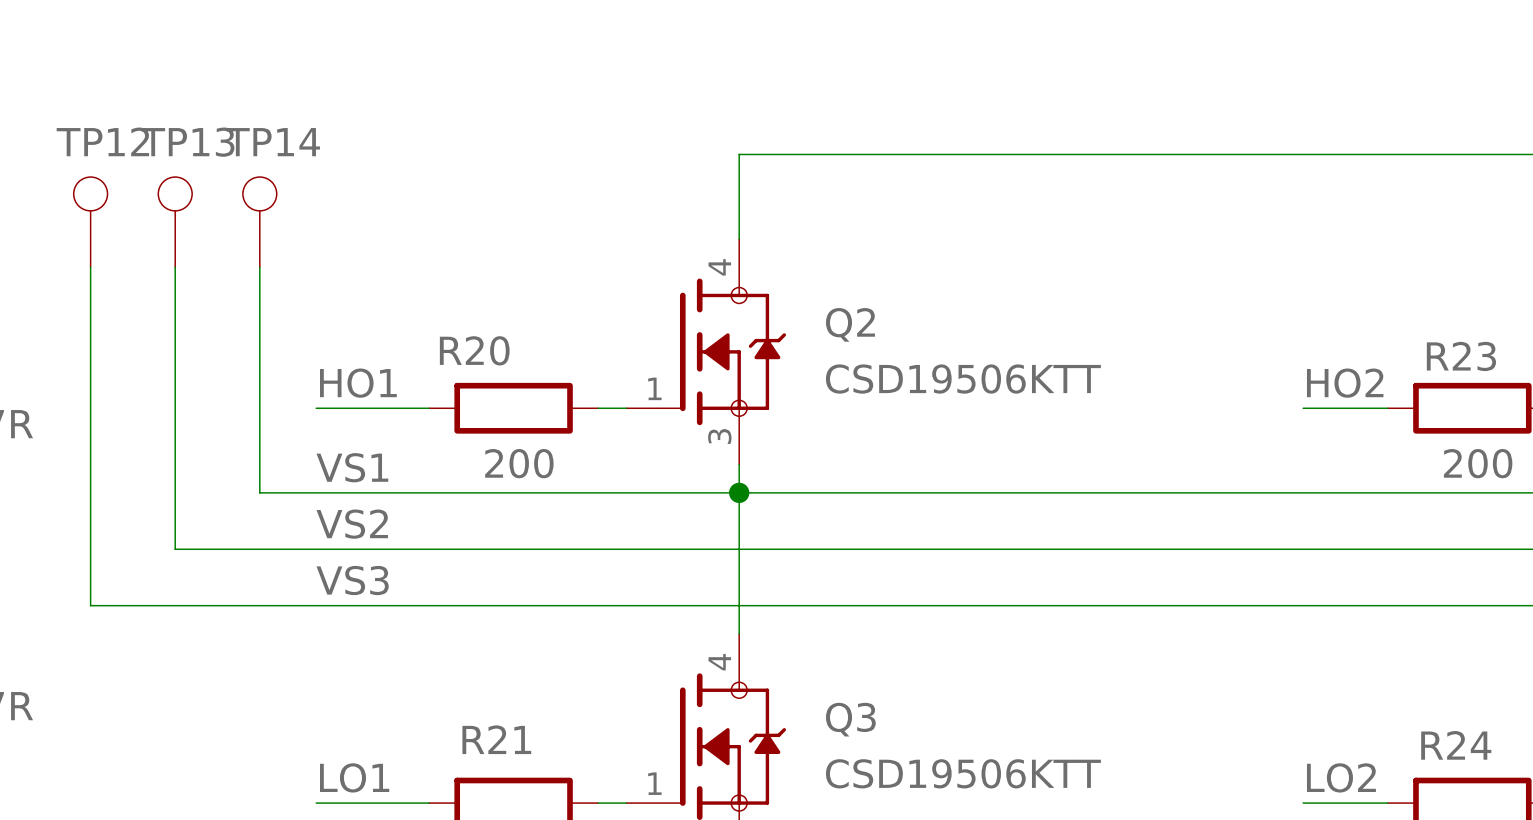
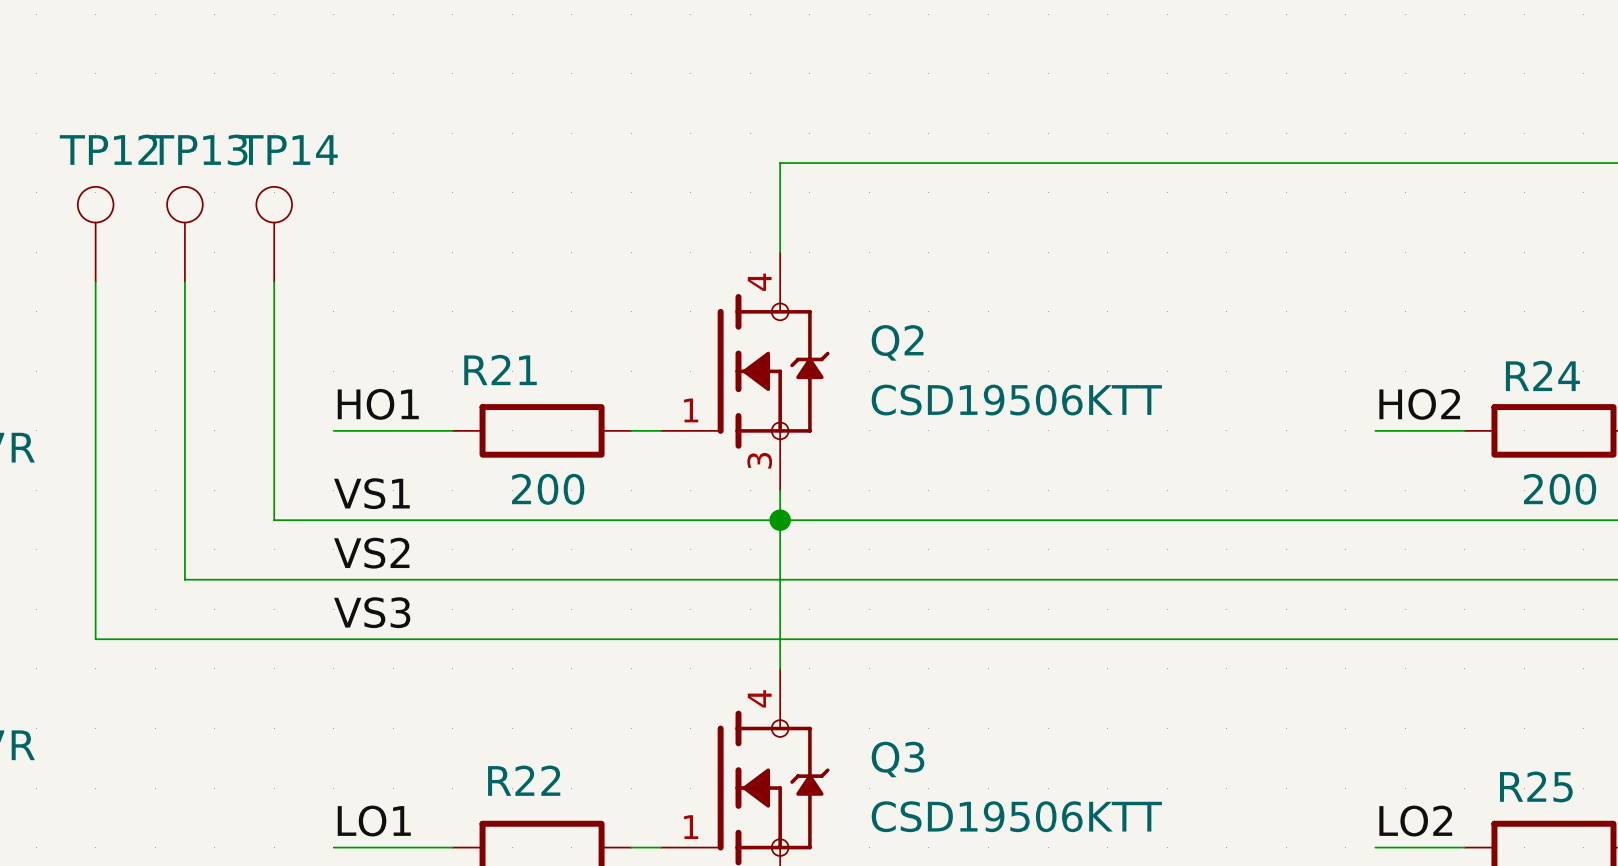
R20 name: R20 (474, 350) -> R21 (500, 369)
R23 name: R23 (1461, 356) -> R24 (1542, 375)
R21 name: R21 (496, 739) -> R22 (524, 780)
R24 name: R24 (1456, 745) -> R25 (1536, 786)

